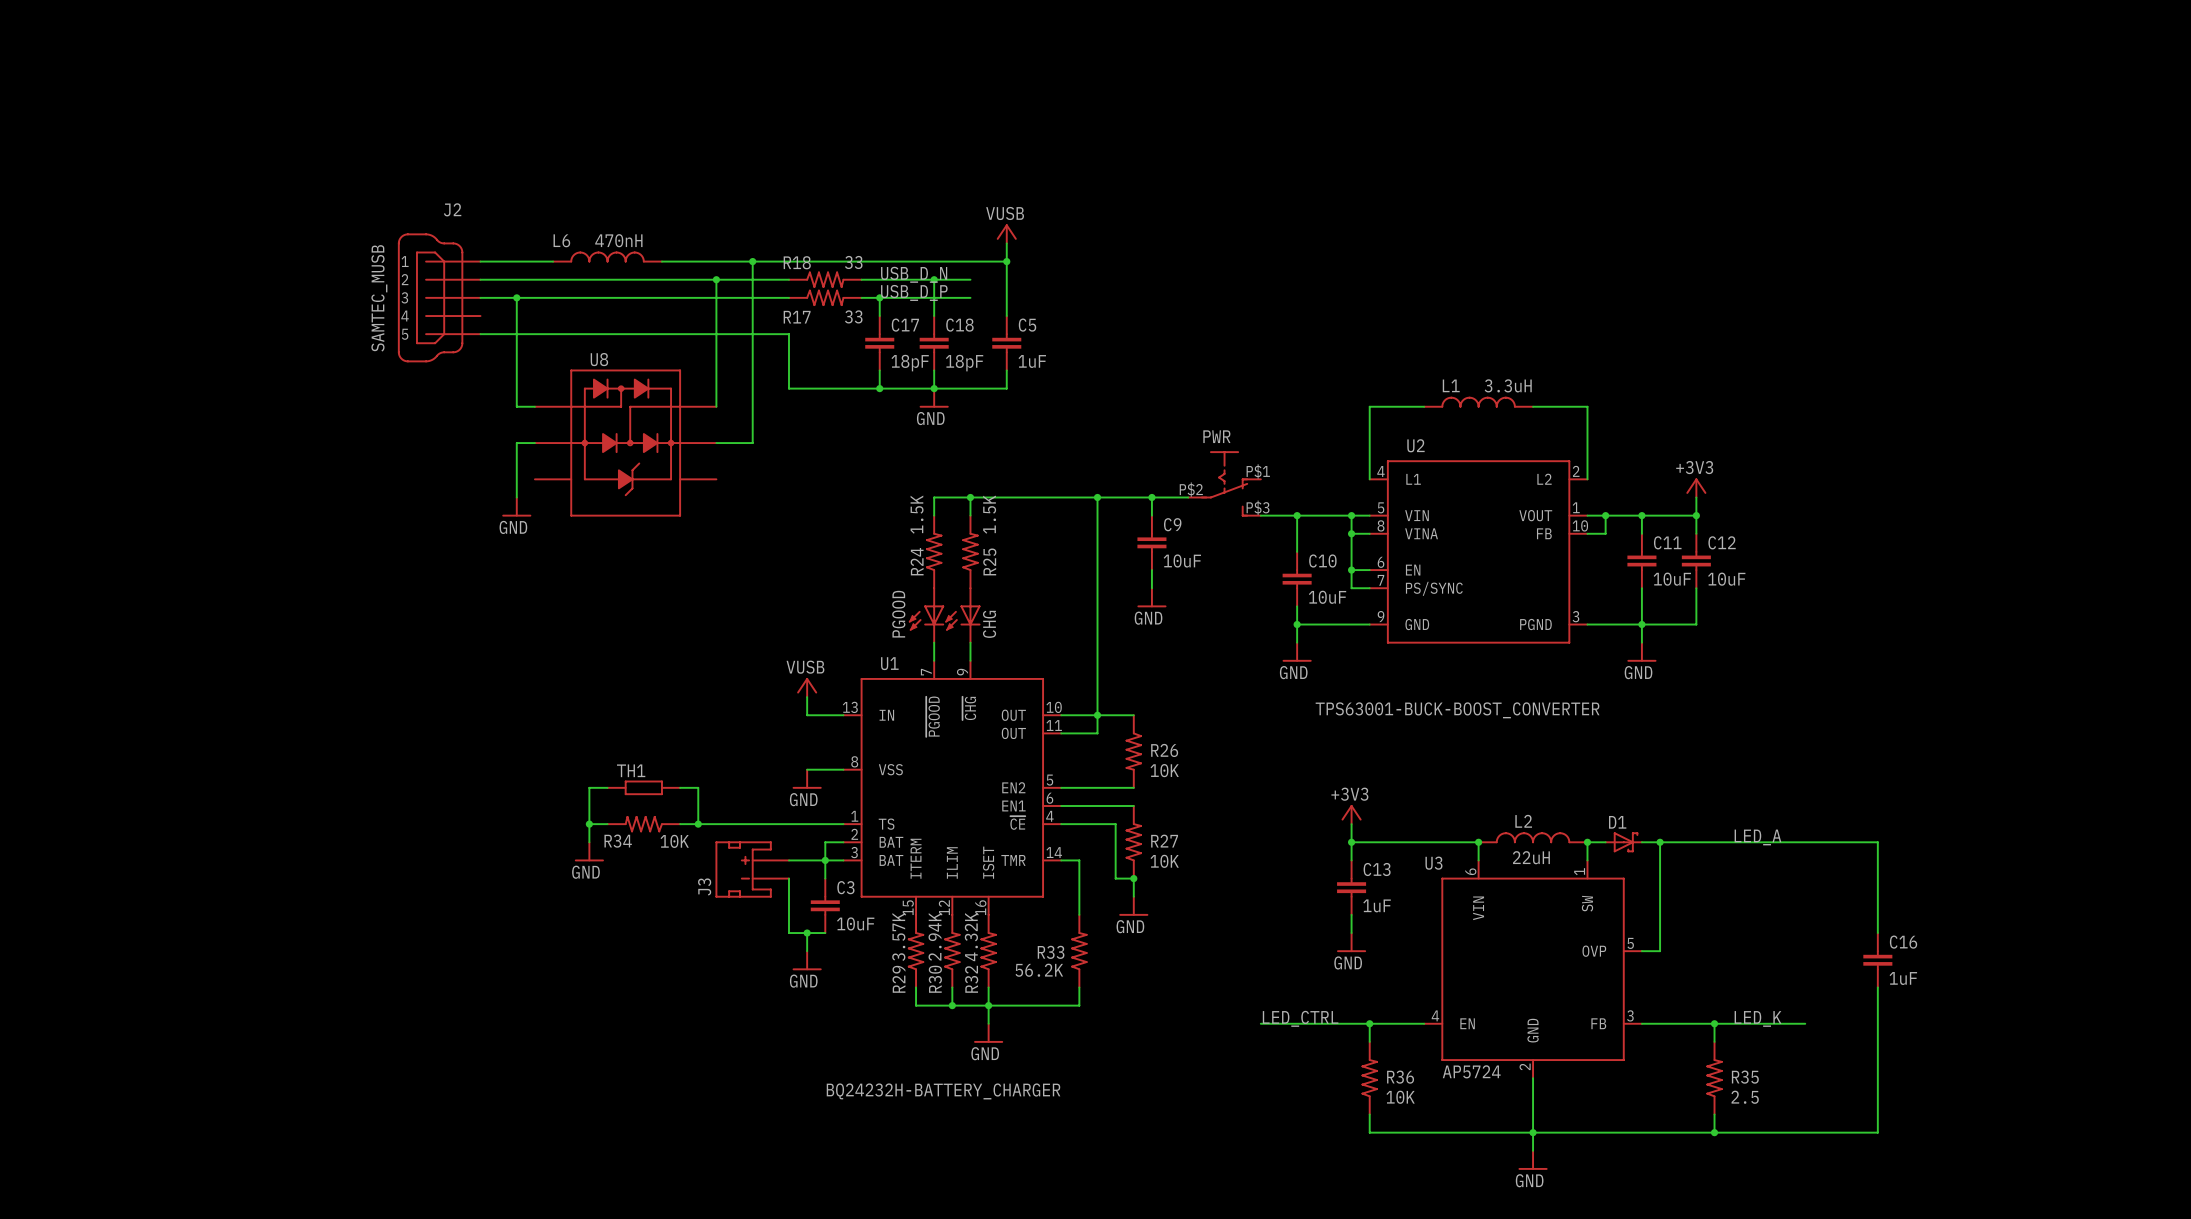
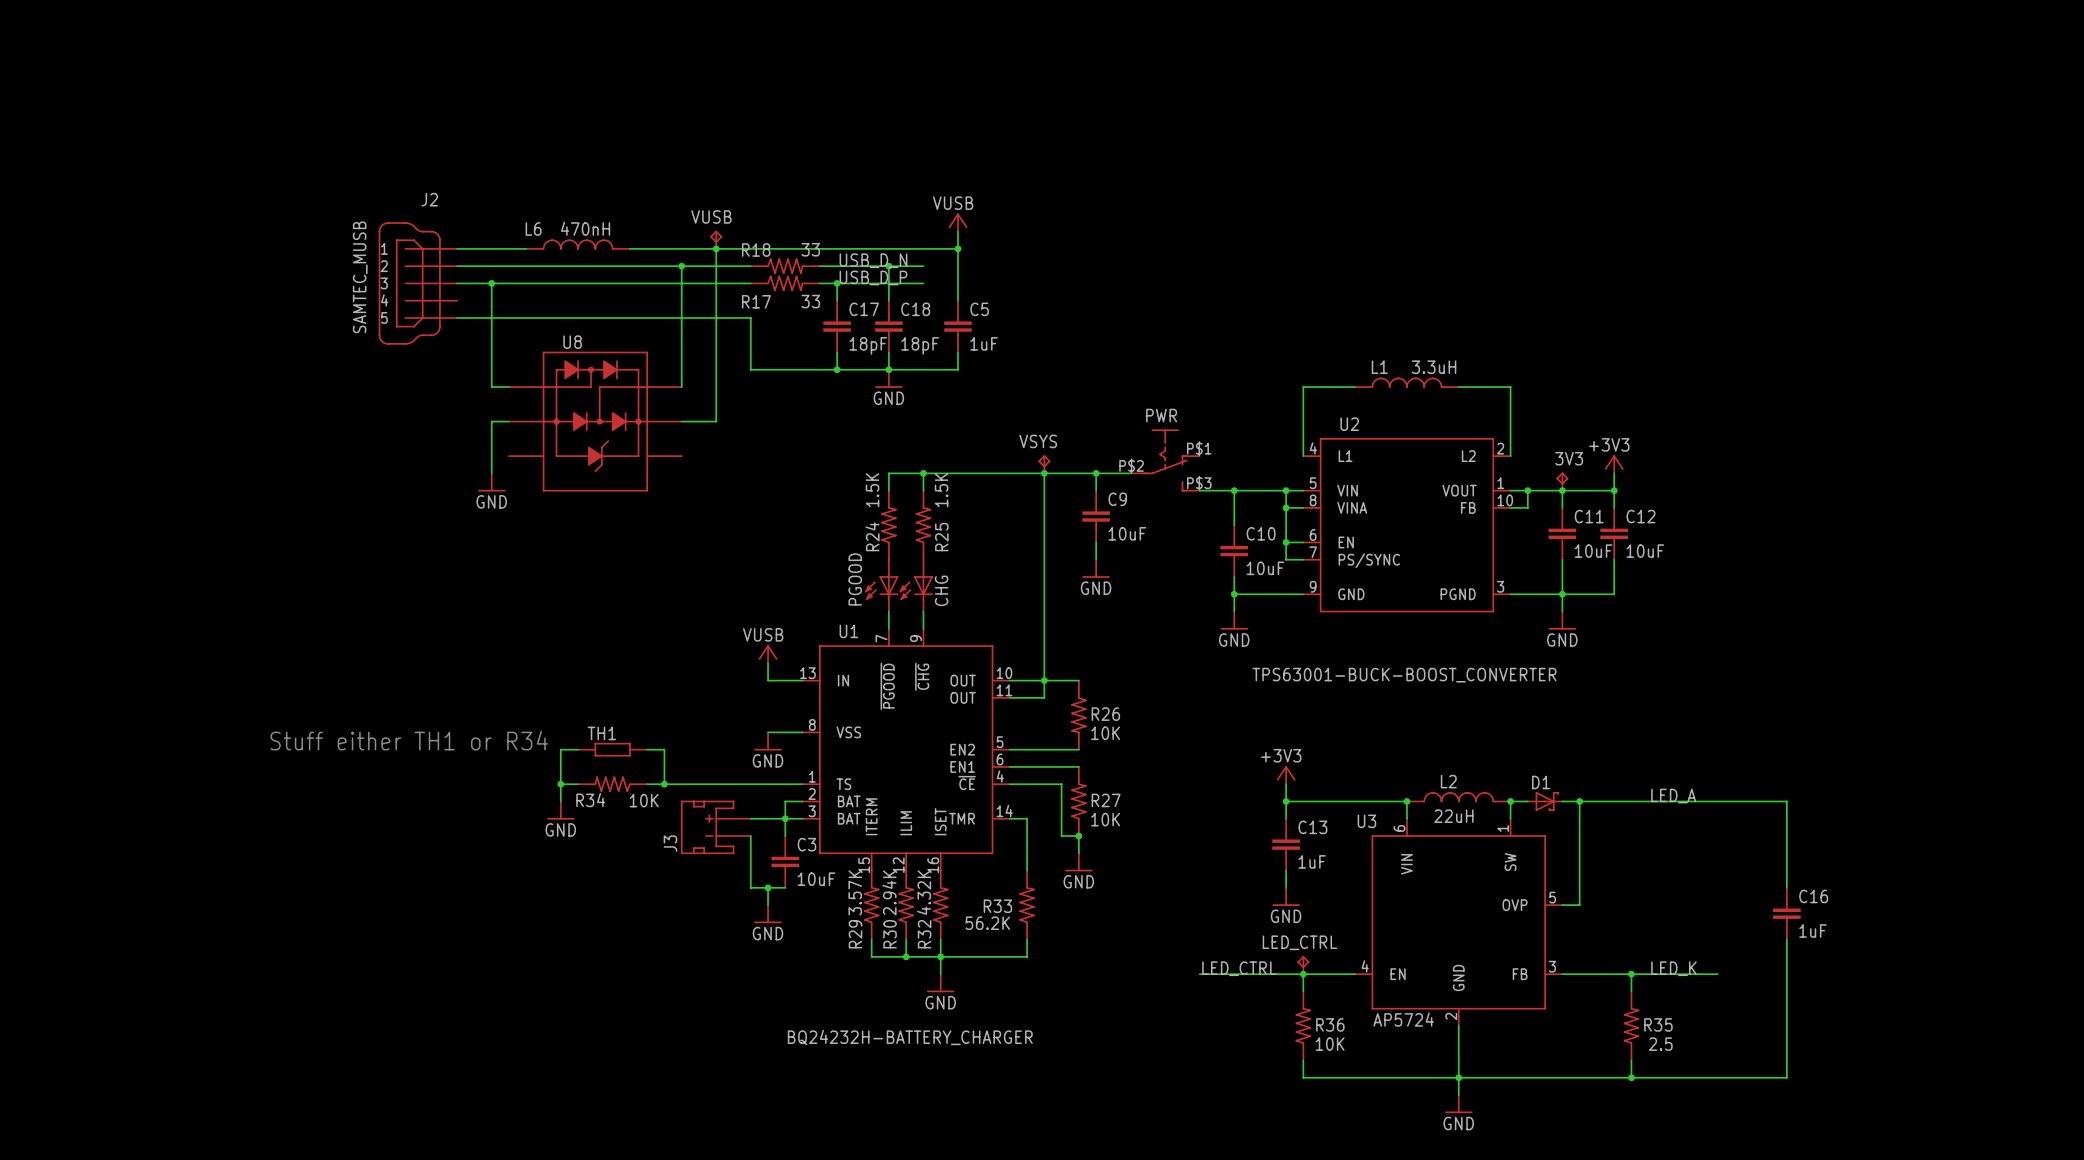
VUSB: none -> (716, 239)
VSYS: none -> (1044, 464)
3V3: none -> (1562, 481)
text: none -> Stuff either TH1 or R34 (409, 740)
LED_CTRL: none -> (1303, 965)

